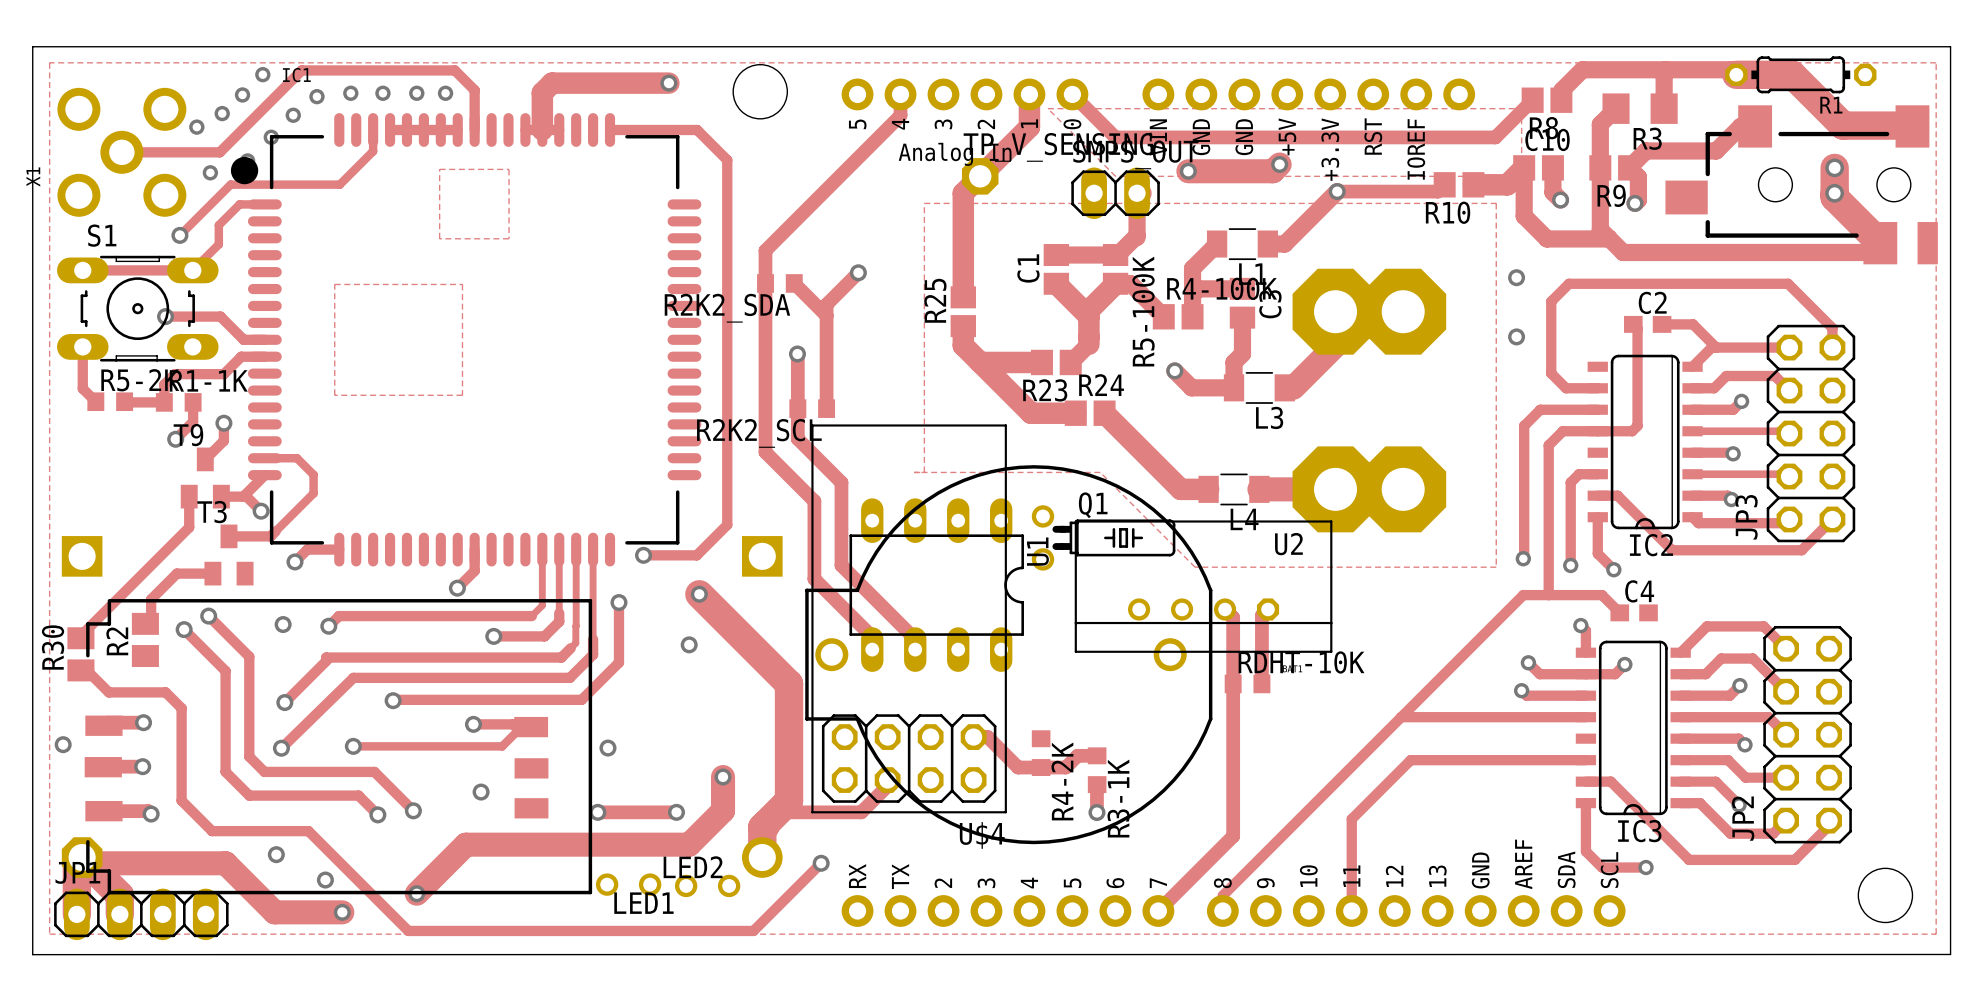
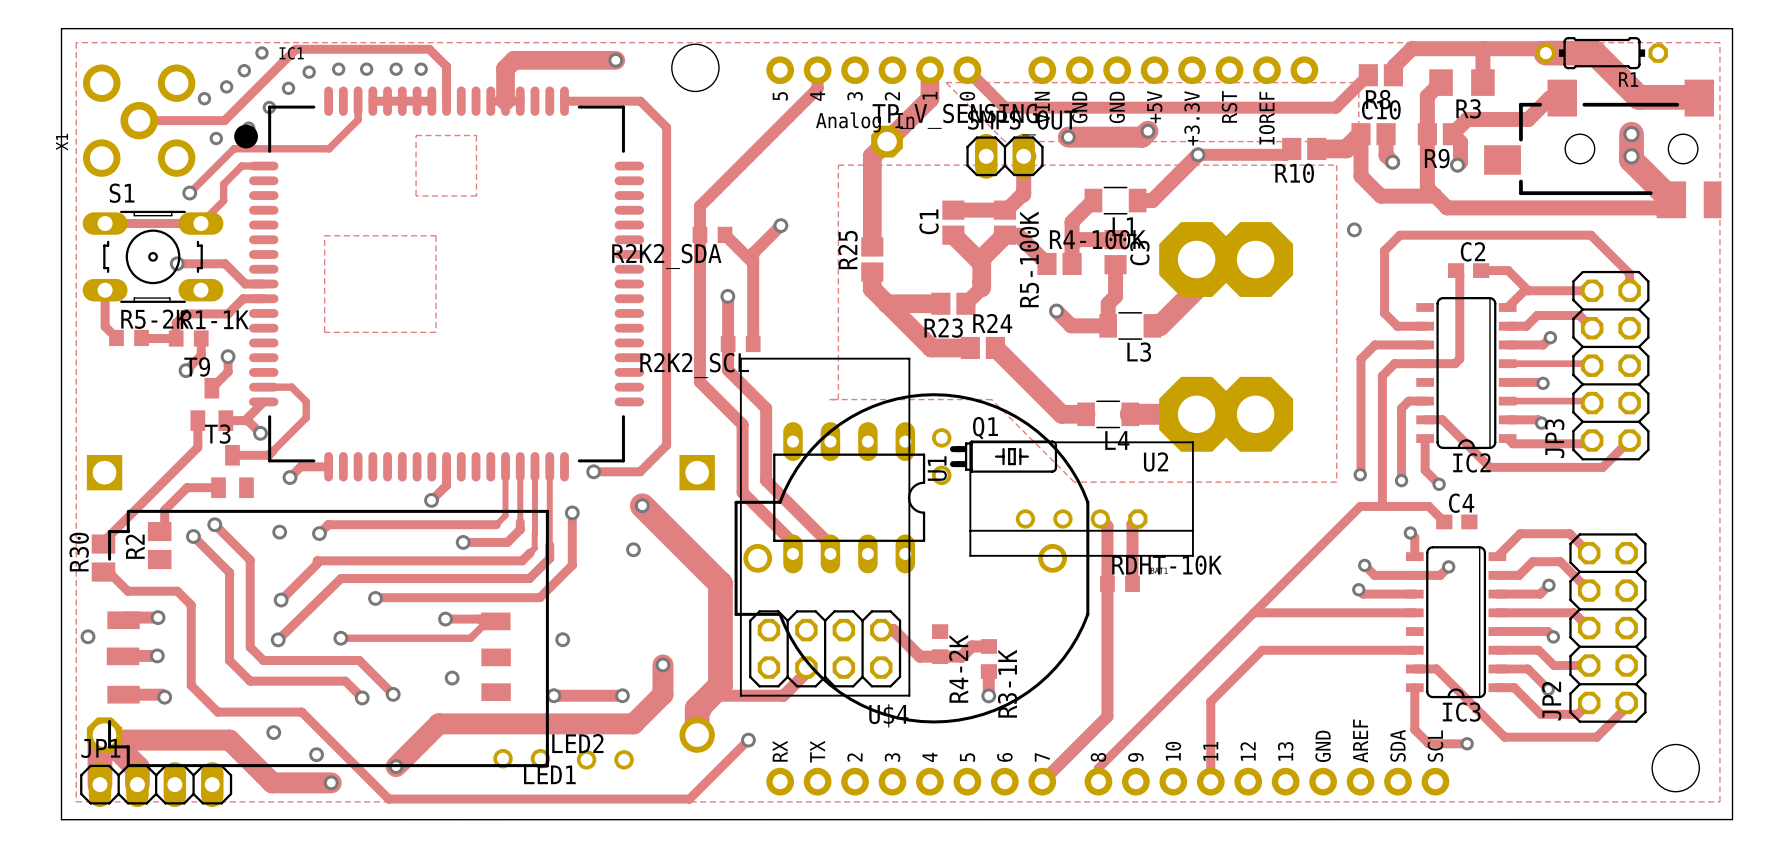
via: (1516, 336) -> none
LED2 position: (628, 884) -> (521, 758)
LED1 position: (707, 885) -> (605, 759)

